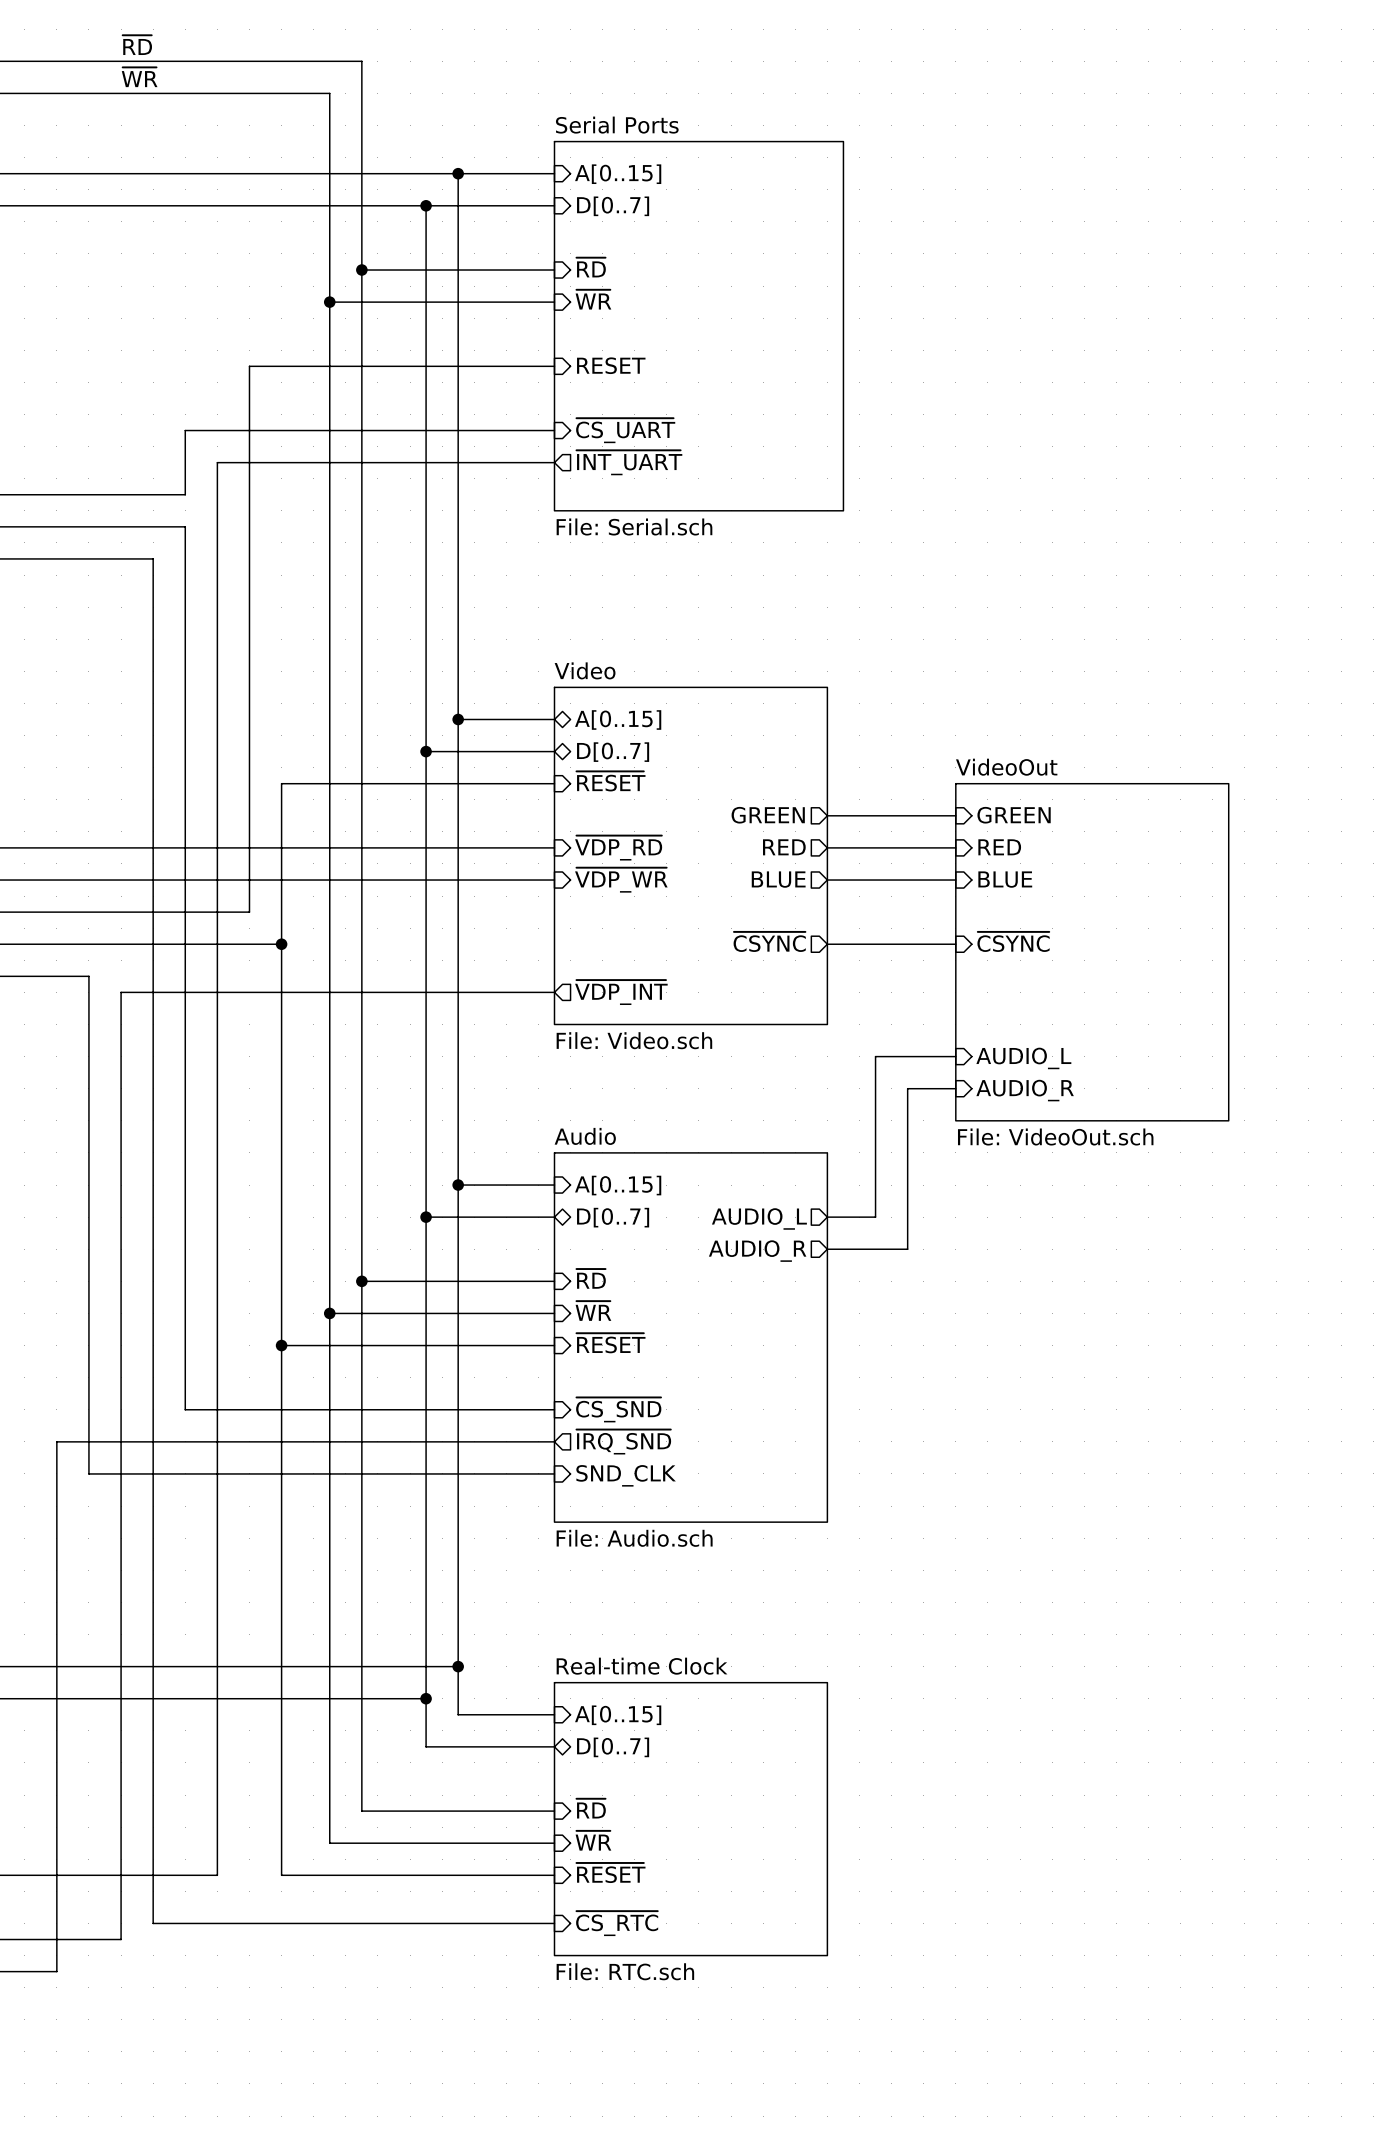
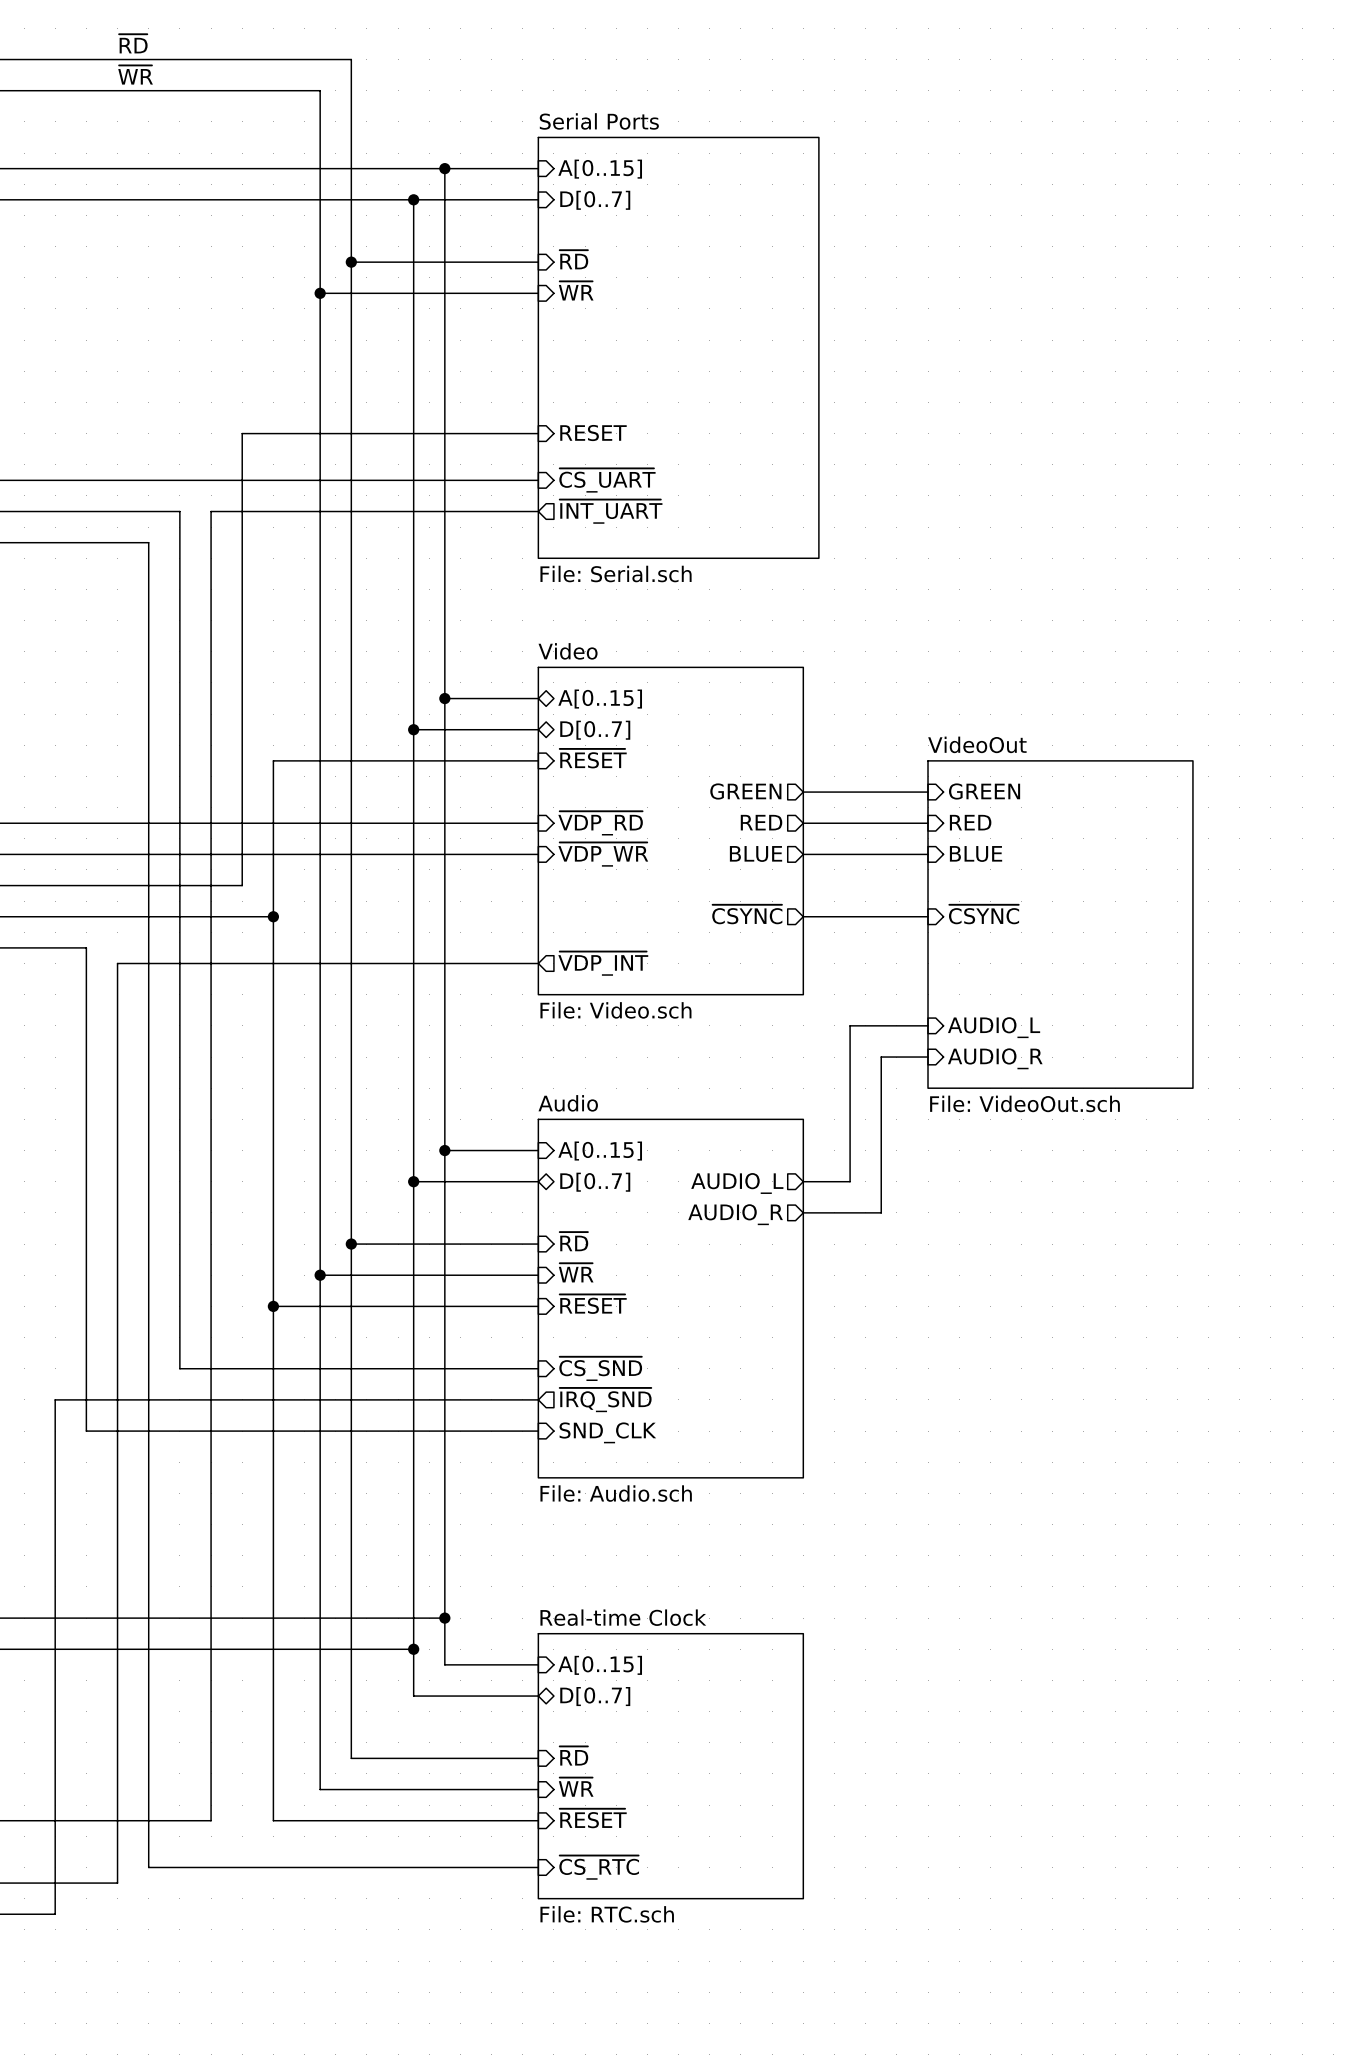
sheet Serial Ports: File: Serial.sch (698, 326) -> none
sheet Serial Ports: none -> File: Serial.sch (678, 347)
sheet pin position: RESET (611, 365) -> RESET (593, 433)
wire: (554, 366) (249, 366) (249, 446) -> (538, 433) (242, 433)
wire: (554, 430) (185, 430) (185, 494) -> (538, 480) (179, 480)
sheet pin position: ~{CS_UART} (625, 430) -> ~{CS_UART} (607, 480)
wire: (554, 462) (217, 462) (217, 526) -> (538, 511) (211, 511)
sheet pin position: ~{INT_UART} (629, 462) -> ~{INT_UART} (611, 511)

